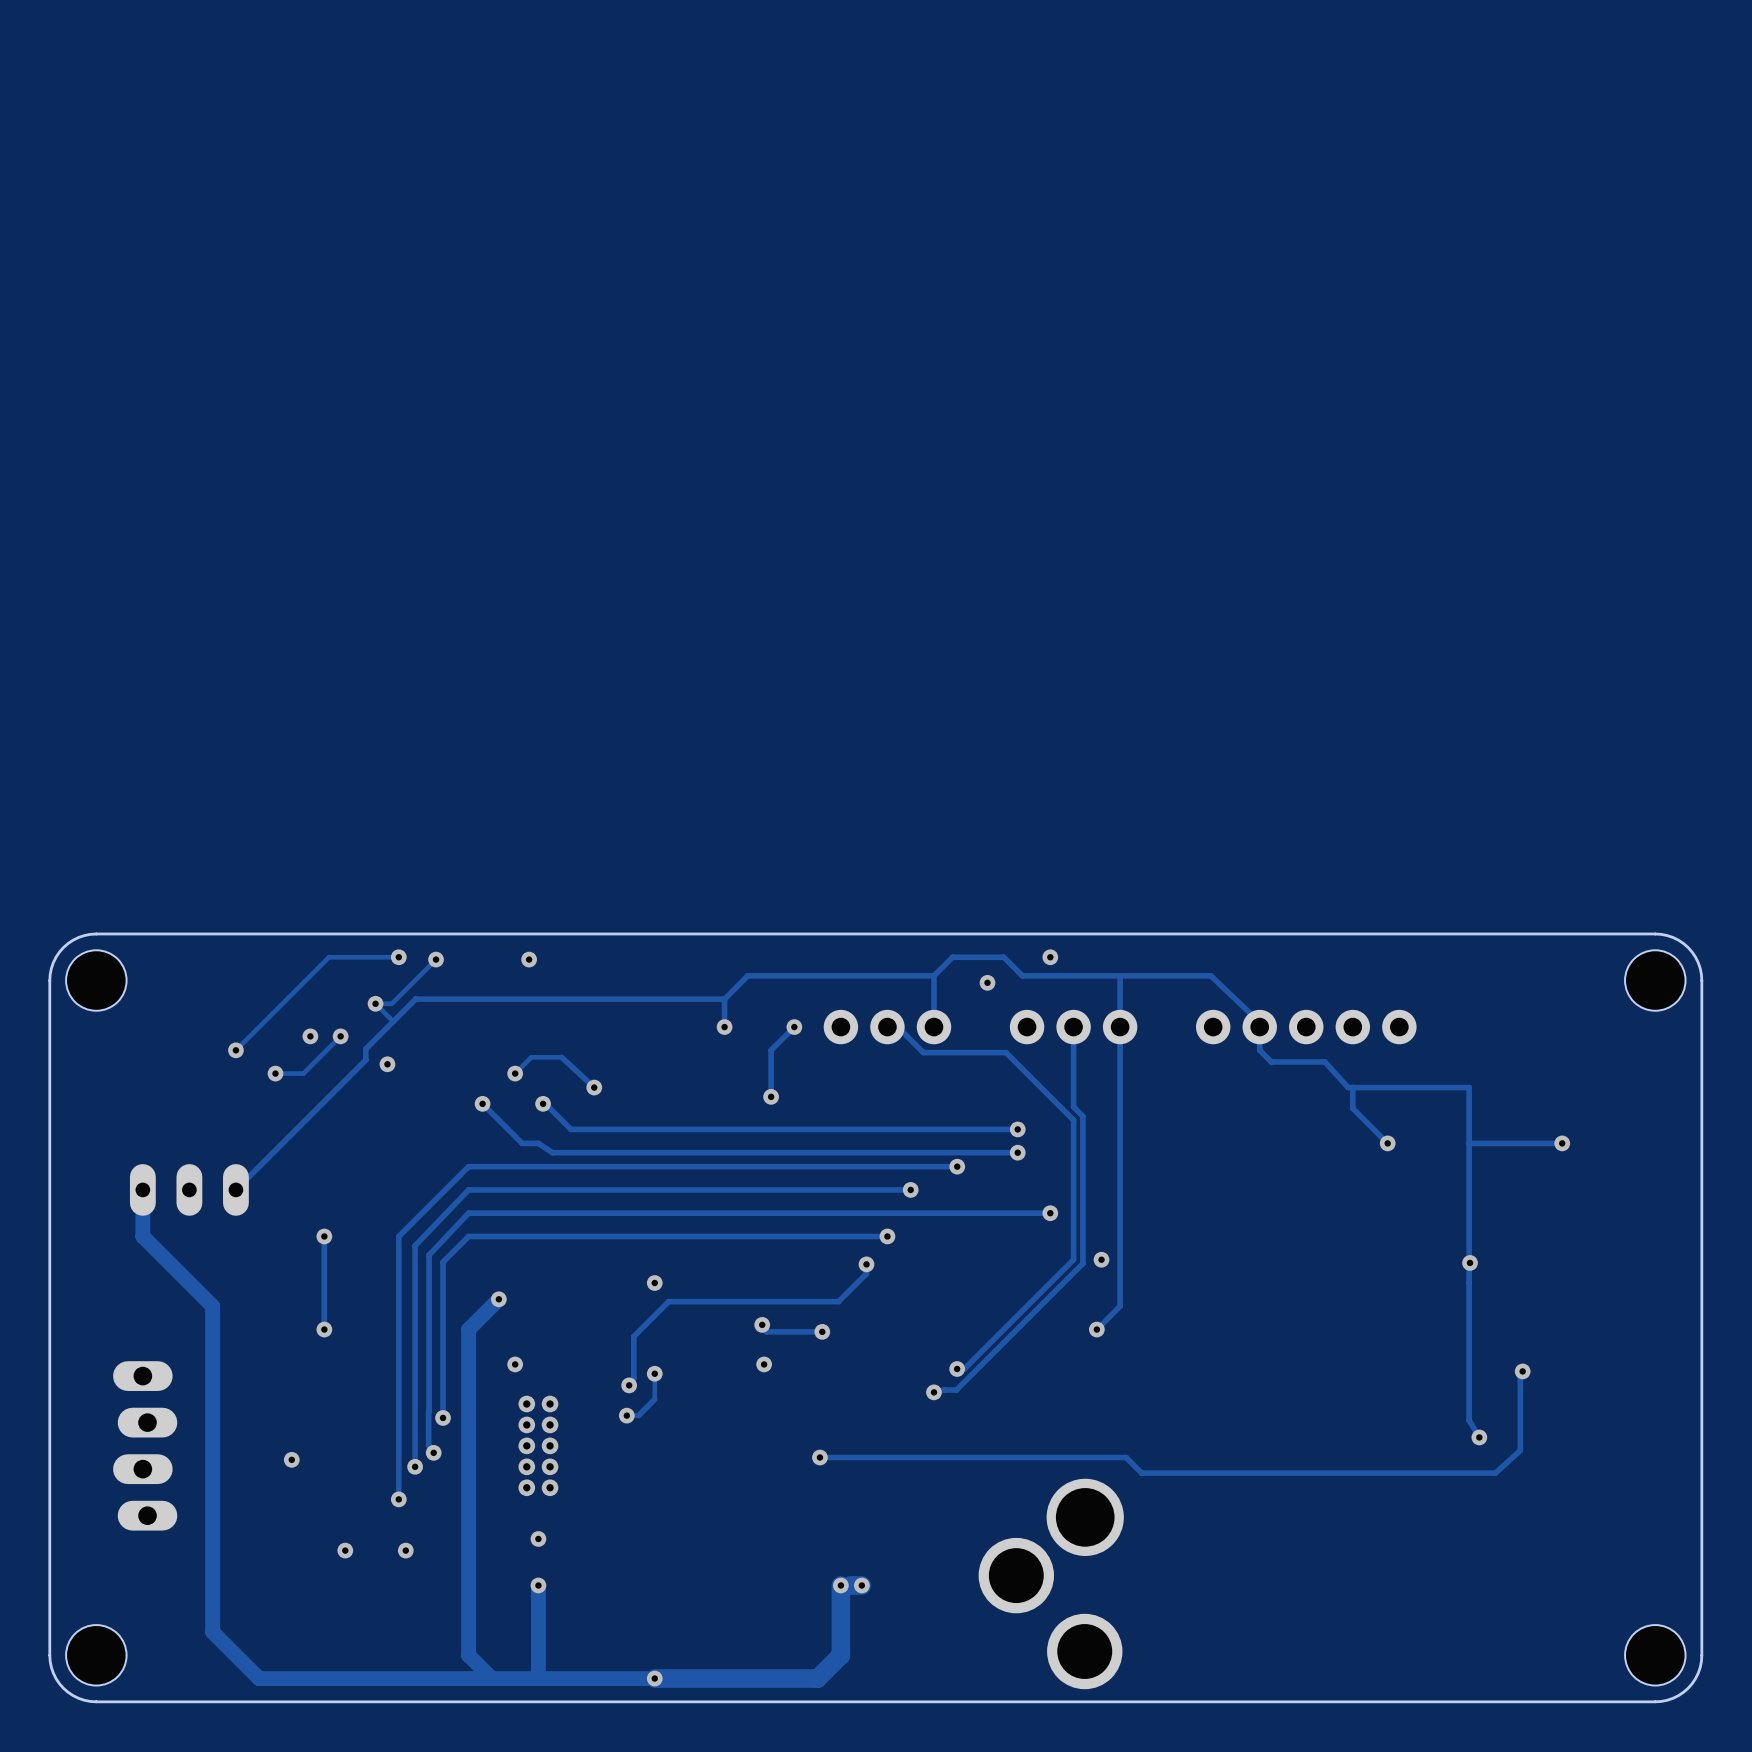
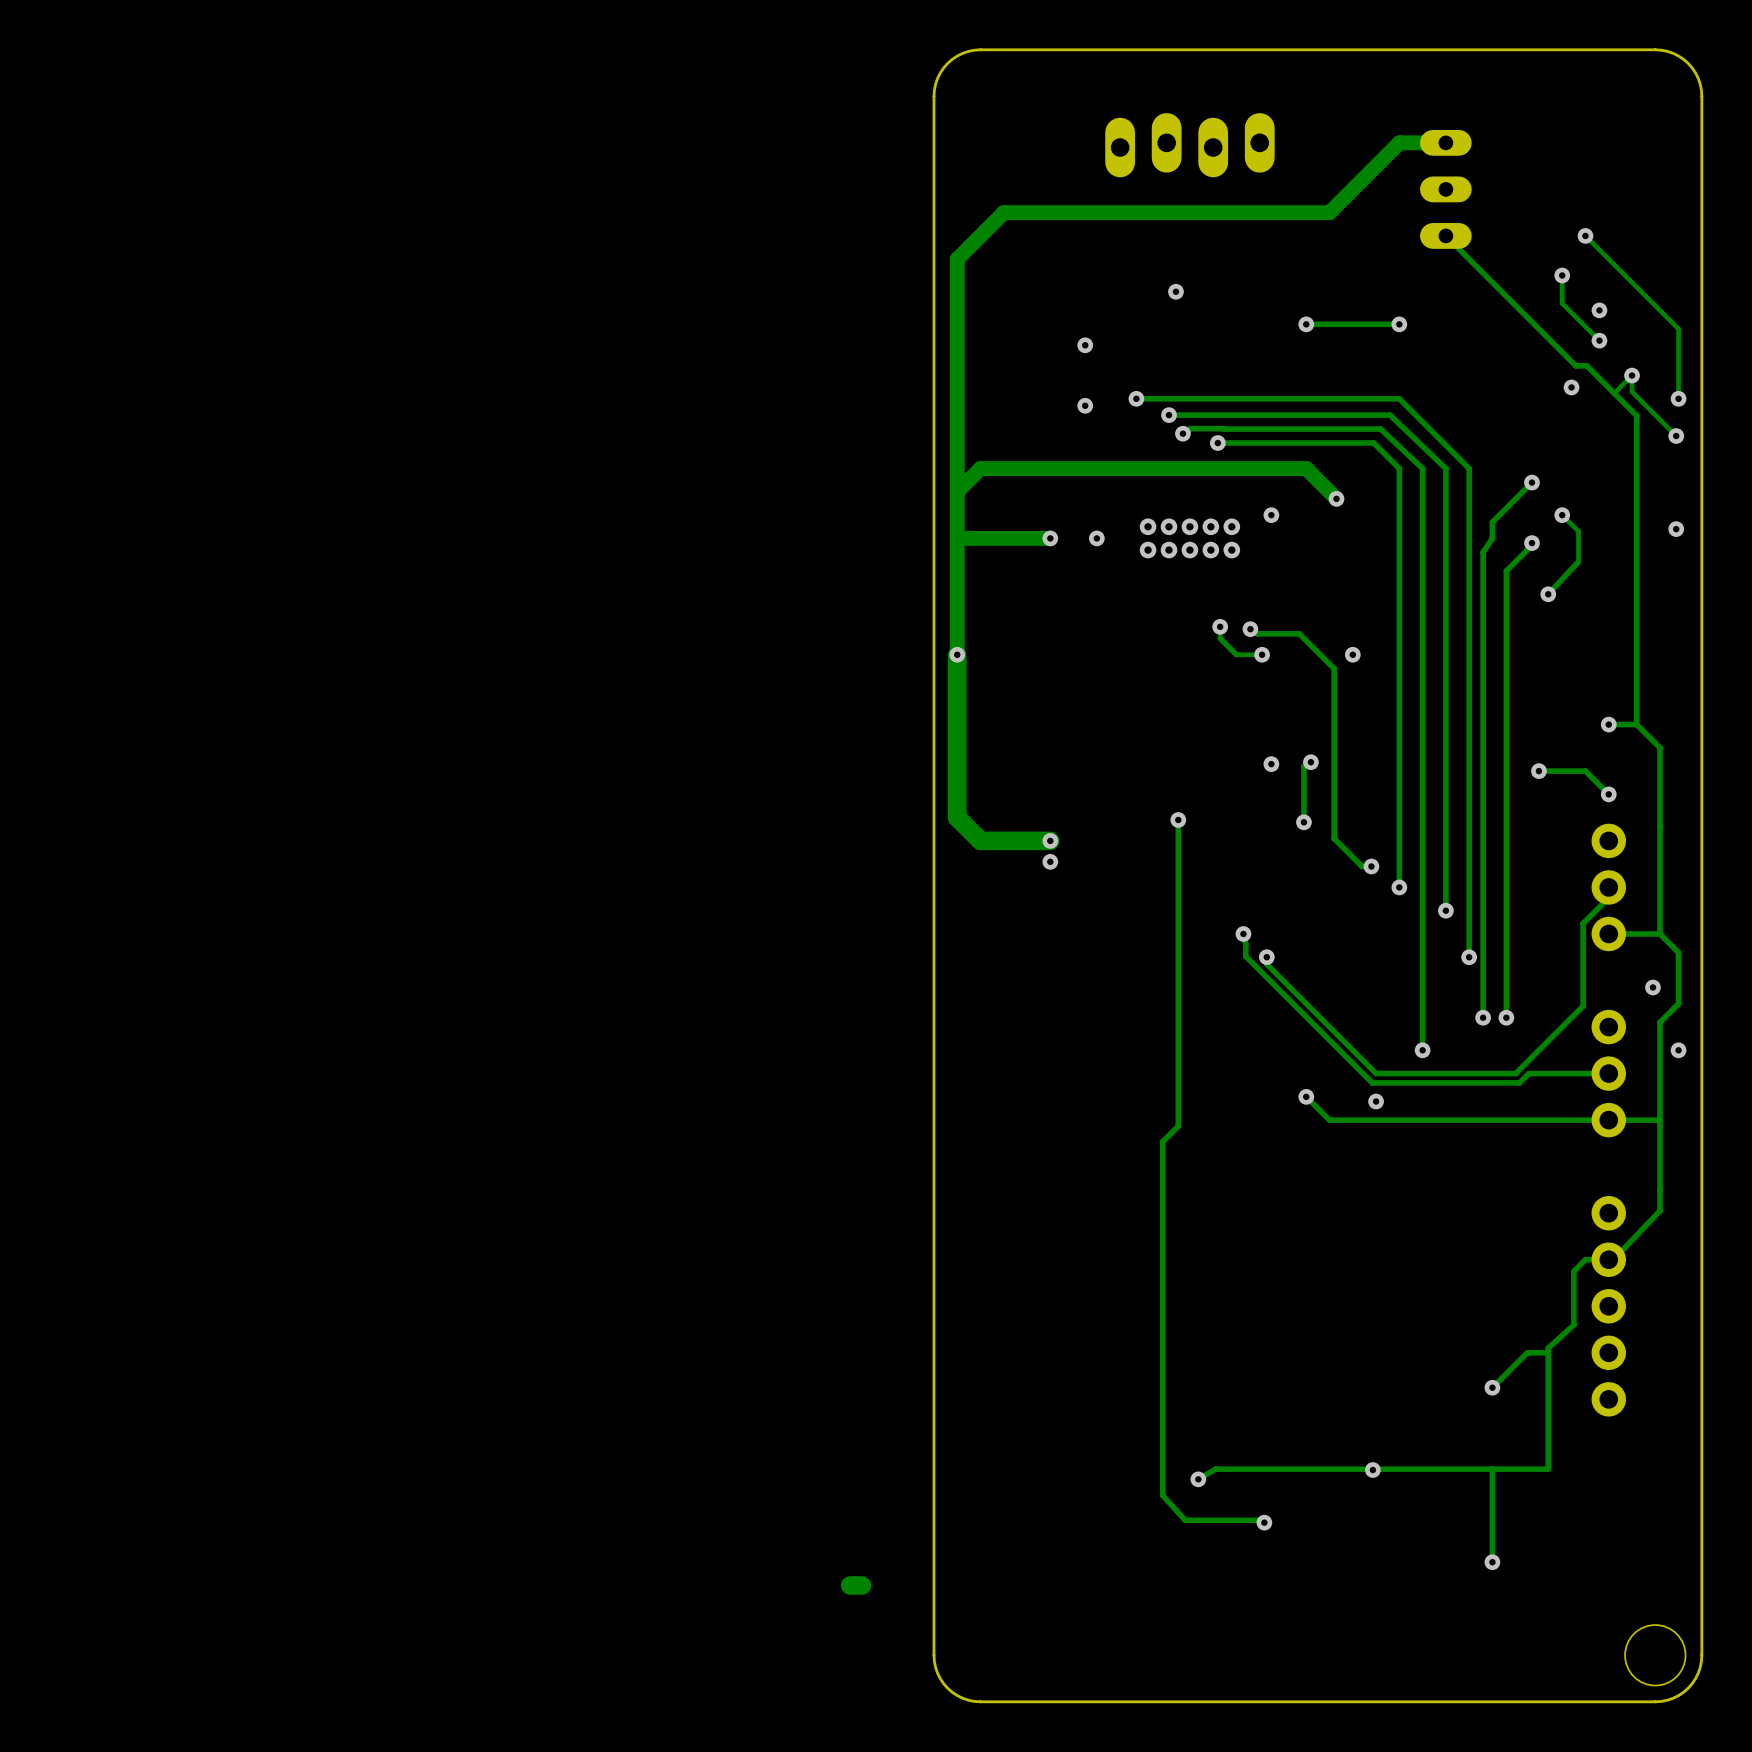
track: none -> (1445, 142) (1399, 142) (1329, 212) (1003, 212) (957, 259) (957, 817) (980, 840) (1050, 840)
part: none -> (1189, 145)
part: none -> (1445, 189)
track: none -> (1445, 235) (1575, 365) (1586, 365) (1636, 415) (1636, 724)
track: none -> (1585, 235) (1678, 329) (1678, 398)
via: none -> (1585, 235)
track: none -> (1562, 275) (1562, 303) (1599, 340)
via: none -> (1562, 275)
via: none -> (1175, 291)
via: none -> (1599, 310)
via: none -> (1306, 324)
track: none -> (1399, 324) (1306, 324)
via: none -> (1399, 324)
via: none -> (1599, 340)
via: none -> (1085, 345)
via: none -> (1632, 375)
via: none -> (1571, 387)
track: none -> (1614, 393) (1632, 375) (1632, 391) (1676, 436)
track: none -> (1136, 398) (1399, 398) (1469, 468) (1469, 957)
via: none -> (1136, 398)
via: none -> (1678, 398)
via: none -> (1085, 405)
track: none -> (1168, 415) (1390, 415) (1445, 468) (1445, 910)
via: none -> (1168, 415)
track: none -> (1182, 433) (1190, 428) (1380, 429) (1422, 468) (1422, 1050)
via: none -> (1182, 433)
via: none -> (1676, 436)
track: none -> (1217, 443) (1373, 443) (1399, 468) (1399, 887)
via: none -> (1217, 443)
track: none -> (1531, 482) (1492, 522) (1492, 538) (1483, 552) (1483, 1017)
via: none -> (1531, 482)
track: none -> (957, 491) (980, 468) (1306, 468) (1336, 498)
via: none -> (1336, 498)
via: none -> (1271, 515)
track: none -> (1562, 515) (1578, 531) (1578, 561) (1548, 594)
via: none -> (1562, 515)
via: none -> (1148, 526)
via: none -> (1168, 526)
via: none -> (1189, 526)
via: none -> (1210, 526)
via: none -> (1231, 526)
via: none -> (1676, 529)
track: none -> (1050, 538) (957, 538)
via: none -> (1050, 538)
via: none -> (1096, 538)
track: none -> (1531, 543) (1531, 545) (1506, 571) (1506, 1017)
via: none -> (1531, 543)
via: none -> (1148, 550)
via: none -> (1168, 550)
via: none -> (1189, 550)
via: none -> (1210, 550)
via: none -> (1231, 550)
via: none -> (1548, 594)
track: none -> (1220, 626) (1220, 638) (1236, 654) (1262, 654)
via: none -> (1220, 626)
track: none -> (1250, 629) (1257, 633) (1299, 633) (1334, 668) (1334, 838) (1362, 866) (1371, 866)
via: none -> (1250, 629)
via: none -> (957, 654)
via: none -> (1262, 654)
via: none -> (1352, 654)
via: none -> (1608, 724)
track: none -> (1636, 724) (1659, 747) (1659, 933)
track: none -> (1636, 724) (1608, 724)
track: none -> (1310, 762) (1308, 761) (1303, 766) (1303, 822)
via: none -> (1310, 762)
via: none -> (1271, 764)
track: none -> (1538, 771) (1585, 771) (1608, 794)
via: none -> (1538, 771)
via: none -> (1608, 794)
track: none -> (1178, 819) (1178, 1126) (1162, 1141) (1162, 1495) (1185, 1520) (1262, 1520) (1264, 1522)
via: none -> (1178, 819)
via: none -> (1303, 822)
via: none -> (1050, 840)
via: none -> (1050, 861)
via: none -> (1371, 866)
via: none -> (1399, 887)
track: none -> (1608, 887) (1608, 897) (1583, 923) (1583, 1006) (1515, 1073) (1376, 1073) (1266, 964) (1266, 957)
part: none -> (1608, 887)
via: none -> (1445, 910)
track: none -> (1243, 933) (1245, 956) (1372, 1082) (1519, 1082) (1528, 1073) (1608, 1073)
via: none -> (1243, 933)
track: none -> (1659, 933) (1608, 933)
track: none -> (1659, 933) (1678, 952) (1678, 1003) (1659, 1022) (1659, 1210) (1613, 1259) (1585, 1259) (1573, 1271) (1573, 1324) (1548, 1348) (1548, 1469) (1215, 1469) (1198, 1479)
track: (398, 957) (329, 957) (235, 1050) -> none
via: (398, 957) -> none
via: (1050, 957) -> none
via: none -> (1266, 957)
via: none -> (1469, 957)
track: (436, 959) (391, 1003) (375, 1003) (393, 1021) -> none
via: (436, 959) -> none
via: (529, 959) -> none
track: (933, 975) (933, 1027) -> none
track: (933, 975) (747, 975) (724, 999) -> none
track: (933, 975) (952, 957) (1003, 957) (1022, 975) (1210, 975) (1259, 1022) (1259, 1050) (1271, 1061) (1324, 1061) (1348, 1087) (1469, 1087) (1469, 1420) (1479, 1437) -> none
track: (1120, 975) (1120, 1306) (1096, 1329) -> none
part: (96, 980) -> none
part: (1655, 980) -> none
board edge: (1701, 980) (1698, 962) (1688, 947) (1673, 937) (1655, 933) (96, 933) (78, 937) (67, 943) (59, 952) (51, 968) (49, 980) (49, 1655) (53, 1673) (59, 1683) (67, 1692) (84, 1700) (96, 1701) (980, 1701) -> (1701, 980) (1701, 96) (1700, 84) (1692, 67) (1683, 59) (1673, 53) (1655, 49) (980, 49) (968, 51) (952, 59) (943, 67) (937, 78) (933, 96) (933, 1655) (937, 1673) (947, 1688) (962, 1698) (980, 1701)
via: (987, 982) -> none
via: none -> (1652, 987)
track: (724, 999) (415, 999) (365, 1049) (365, 1060) (235, 1189) -> none
track: (724, 999) (724, 1027) -> none
via: (375, 1003) -> none
via: none -> (1483, 1017)
via: none -> (1506, 1017)
via: (724, 1027) -> none
track: (794, 1027) (771, 1050) (771, 1096) -> none
via: (794, 1027) -> none
track: (887, 1027) (897, 1027) (923, 1052) (1006, 1052) (1073, 1120) (1073, 1259) (964, 1369) (957, 1369) -> none
part: (887, 1027) -> none
track: (1073, 1027) (1073, 1106) (1082, 1116) (1082, 1263) (956, 1390) (933, 1392) -> none
part: (1073, 1027) -> none
part rotation: 0° (1306, 1027) -> 90° clockwise (1608, 1306)
part position: (1306, 1027) -> (1608, 1306)
via: (310, 1036) -> none
track: (340, 1036) (303, 1073) (275, 1073) -> none
via: (340, 1036) -> none
via: (235, 1050) -> none
via: none -> (1422, 1050)
via: none -> (1678, 1050)
via: (387, 1064) -> none
via: (275, 1073) -> none
track: (515, 1073) (531, 1057) (561, 1057) (594, 1087) -> none
via: (515, 1073) -> none
part: none -> (1608, 1073)
via: (594, 1087) -> none
track: (1352, 1087) (1352, 1108) (1387, 1143) -> none
via: (771, 1096) -> none
track: none -> (1306, 1096) (1329, 1120) (1659, 1120)
via: none -> (1306, 1096)
track: (482, 1103) (522, 1143) (538, 1143) (552, 1152) (1017, 1152) -> none
via: (482, 1103) -> none
track: (543, 1103) (545, 1103) (571, 1129) (1017, 1129) -> none
via: (543, 1103) -> none
via: (1017, 1129) -> none
via position: (1387, 1143) -> (1376, 1101)
track: (1562, 1143) (1469, 1143) -> none
via: (1562, 1143) -> none
via: (1017, 1152) -> none
track: (957, 1166) (468, 1166) (398, 1236) (398, 1499) -> none
via: (957, 1166) -> none
track: (142, 1189) (142, 1236) (212, 1306) (212, 1632) (259, 1678) (817, 1678) (840, 1655) (840, 1585) -> none
part: (189, 1189) -> none
track: (910, 1189) (468, 1189) (415, 1245) (415, 1466) -> none
via: (910, 1189) -> none
track: (1050, 1213) (468, 1213) (429, 1255) (428, 1445) (433, 1452) -> none
via: (1050, 1213) -> none
track: (324, 1236) (324, 1329) -> none
via: (324, 1236) -> none
track: (887, 1236) (468, 1236) (443, 1262) (443, 1417) -> none
via: (887, 1236) -> none
via: (1101, 1259) -> none
via: (1470, 1262) -> none
track: (866, 1264) (866, 1273) (838, 1301) (668, 1301) (633, 1336) (633, 1378) (629, 1385) -> none
via: (866, 1264) -> none
via: (654, 1283) -> none
track: (498, 1299) (468, 1329) (468, 1655) (491, 1678) -> none
via: (498, 1299) -> none
track: (762, 1324) (761, 1327) (766, 1331) (822, 1331) -> none
via: (762, 1324) -> none
via: (324, 1329) -> none
via: (1096, 1329) -> none
via: (822, 1331) -> none
track: none -> (1548, 1352) (1527, 1352) (1492, 1387)
via: (515, 1364) -> none
via: (764, 1364) -> none
via: (957, 1369) -> none
track: (1522, 1371) (1520, 1373) (1520, 1450) (1495, 1473) (1141, 1473) (1126, 1457) (819, 1457) -> none
via: (1522, 1371) -> none
track: (654, 1373) (654, 1399) (638, 1415) (626, 1415) -> none
via: (654, 1373) -> none
via: (629, 1385) -> none
via: none -> (1492, 1387)
via: (933, 1392) -> none
via: (526, 1404) -> none
via: (550, 1404) -> none
via: (626, 1415) -> none
via: (443, 1417) -> none
via: (526, 1424) -> none
via: (550, 1424) -> none
via: (1479, 1437) -> none
part: (145, 1445) -> none
via: (526, 1445) -> none
via: (550, 1445) -> none
via: (433, 1452) -> none
via: (819, 1457) -> none
via: (291, 1459) -> none
via: (415, 1466) -> none
via: (526, 1466) -> none
via: (550, 1466) -> none
track: none -> (1492, 1469) (1492, 1562)
via: none -> (1372, 1470)
via: none -> (1198, 1479)
via: (526, 1487) -> none
via: (550, 1487) -> none
via: (398, 1499) -> none
via: none -> (1264, 1522)
via: (538, 1538) -> none
via: (345, 1550) -> none
via: (405, 1550) -> none
via: none -> (1492, 1562)
part: (1051, 1583) -> none
track: (538, 1585) (538, 1678) -> none
via: (538, 1585) -> none
via: (840, 1585) -> none
via: (861, 1585) -> none
part: (96, 1655) -> none
via: (654, 1678) -> none

